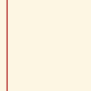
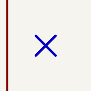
no-connect mark: none -> (45, 45)

